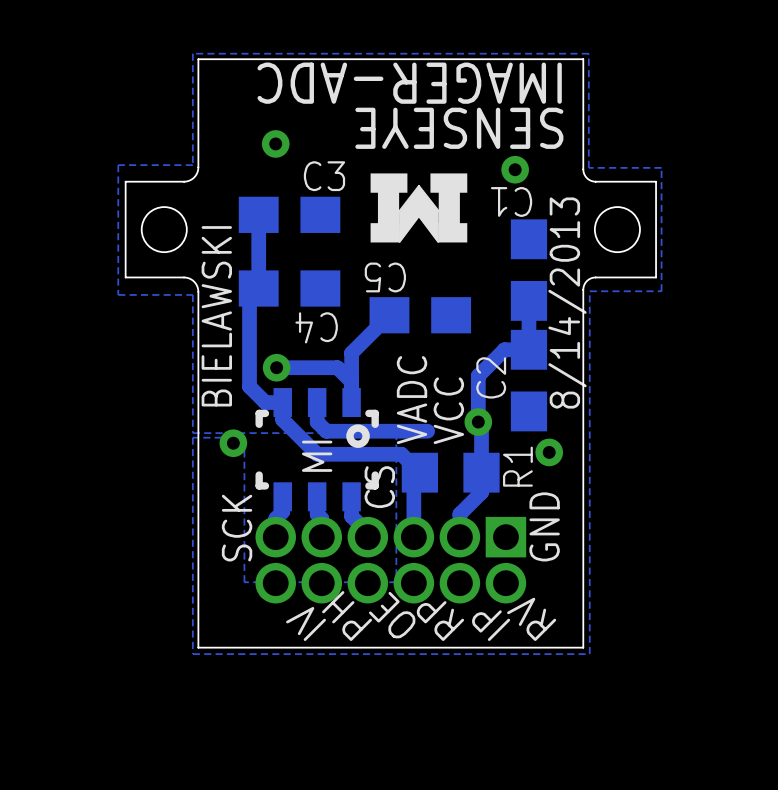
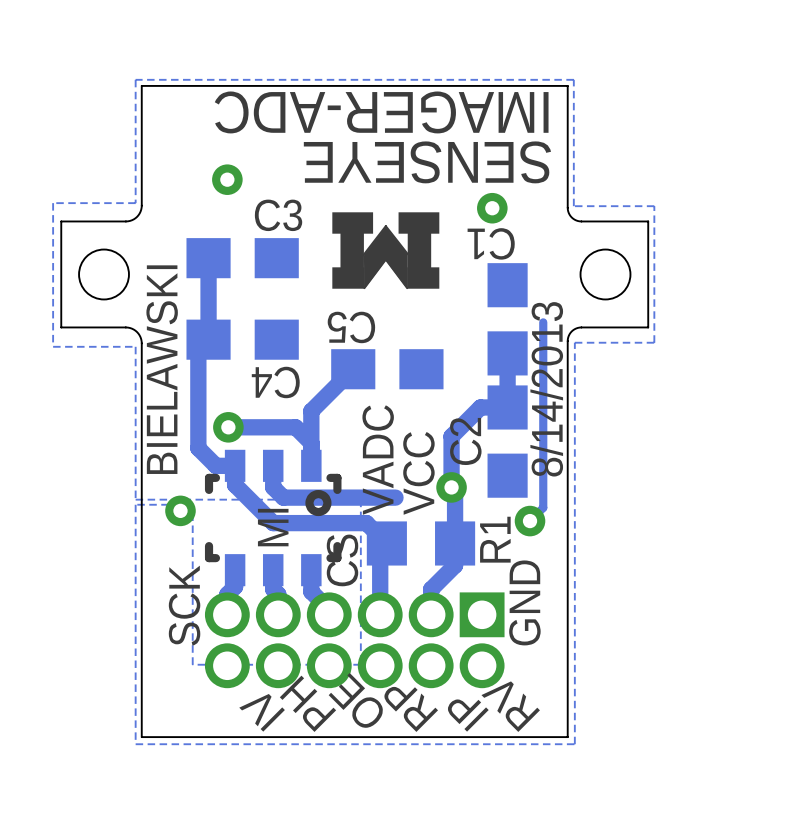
track: none -> (543, 322) (543, 507) (530, 521)

